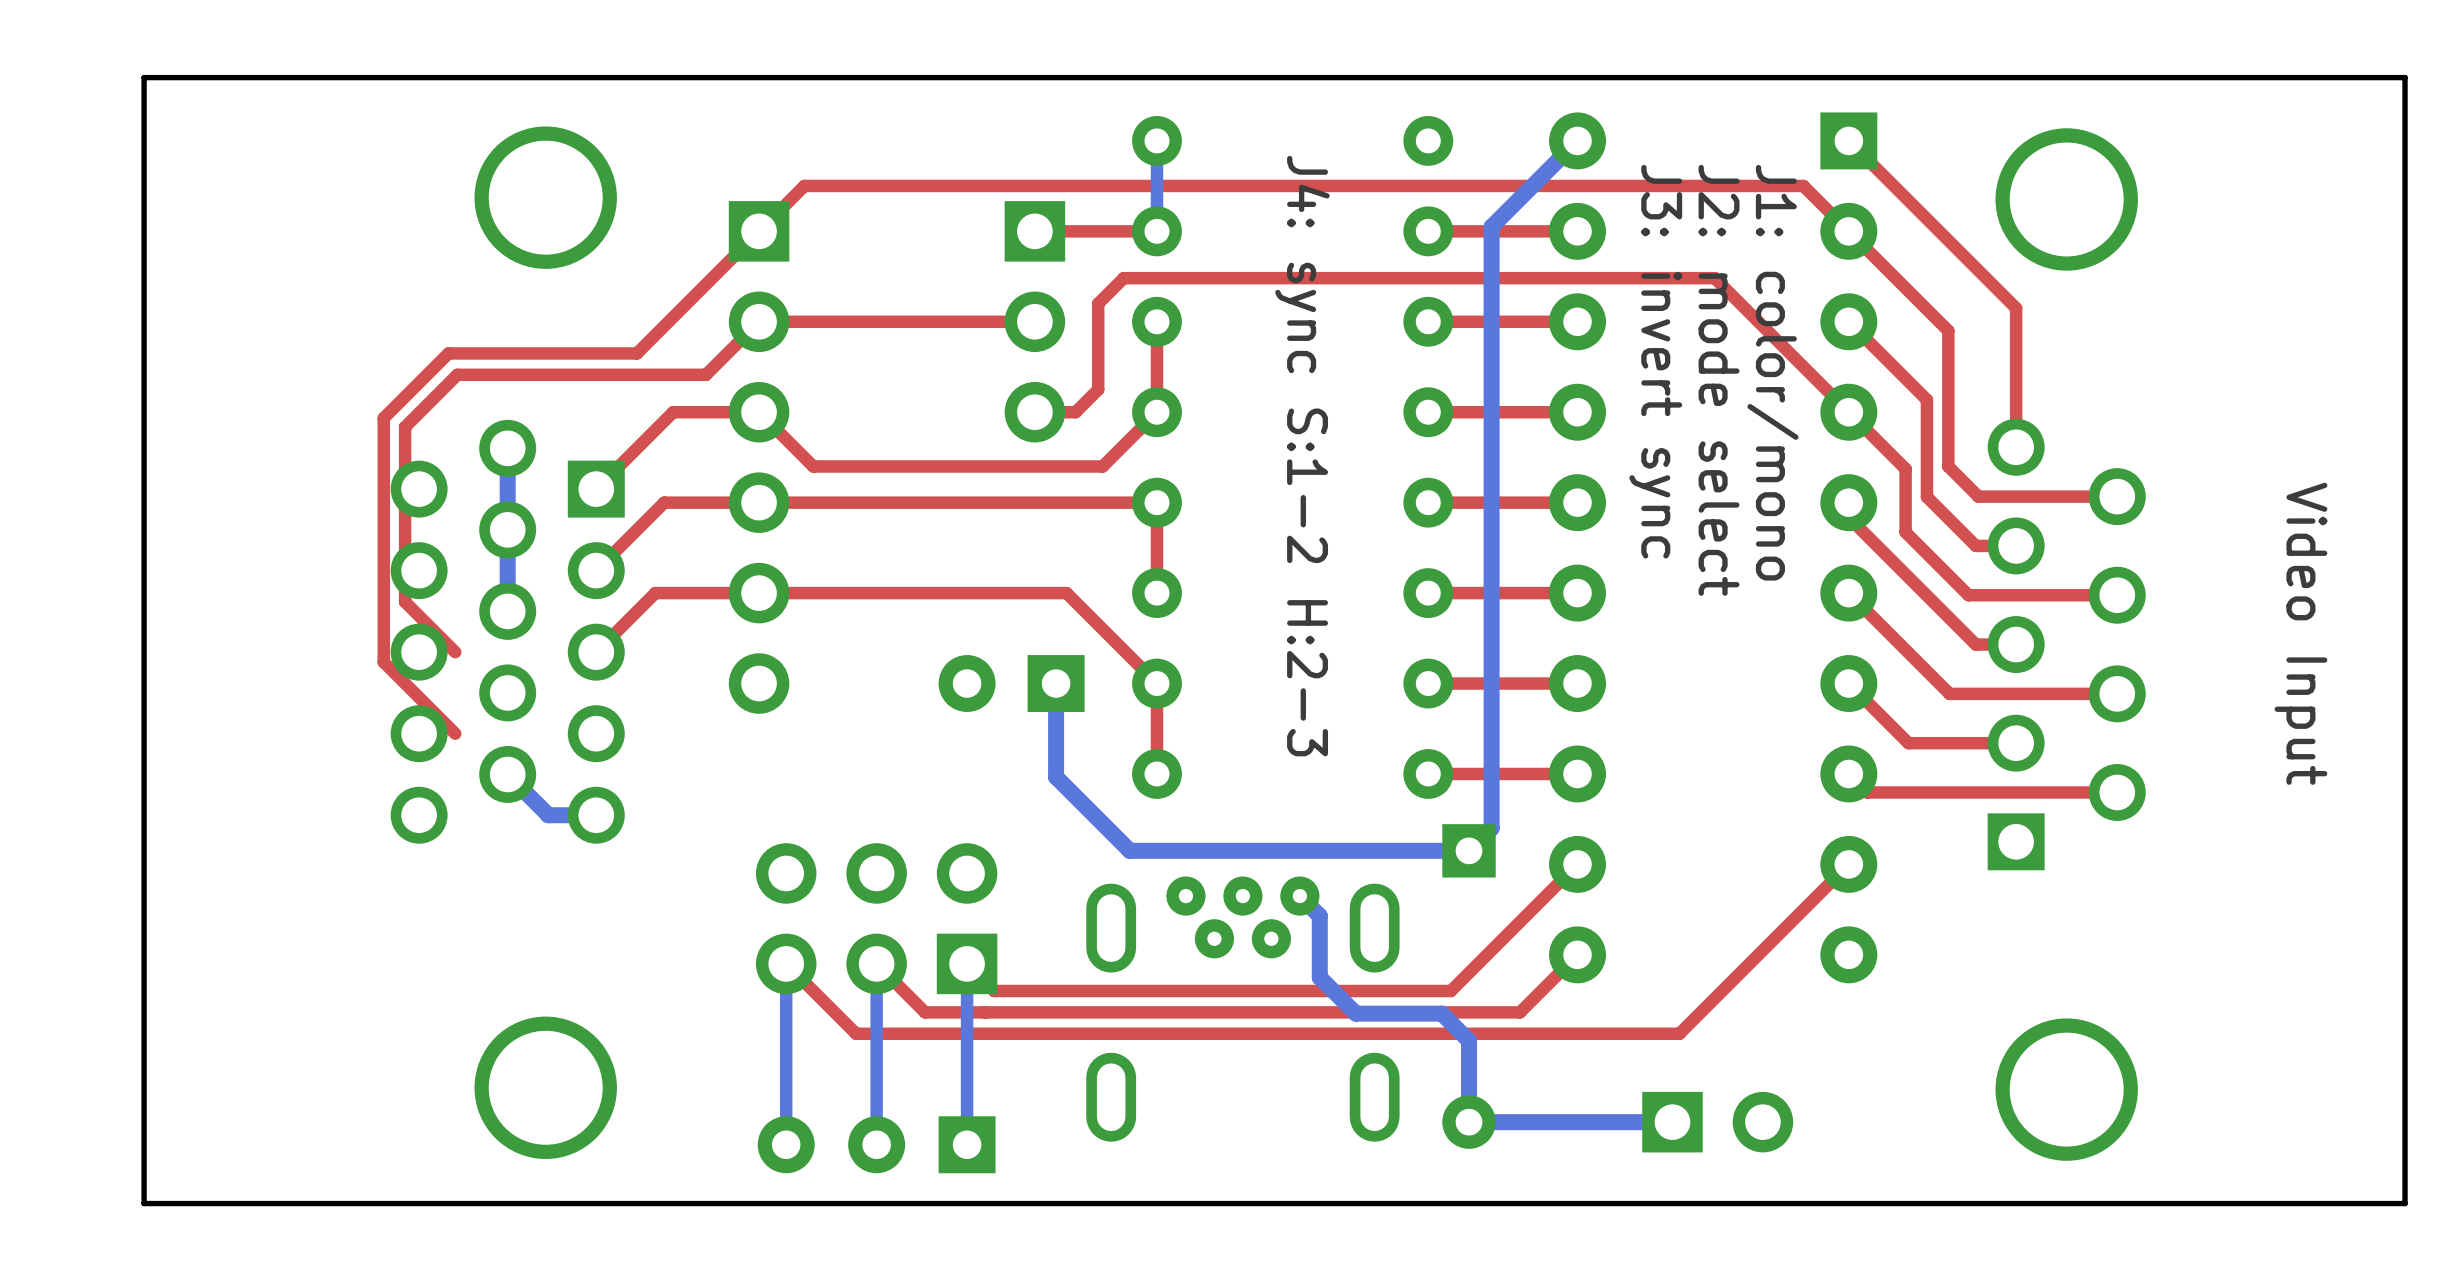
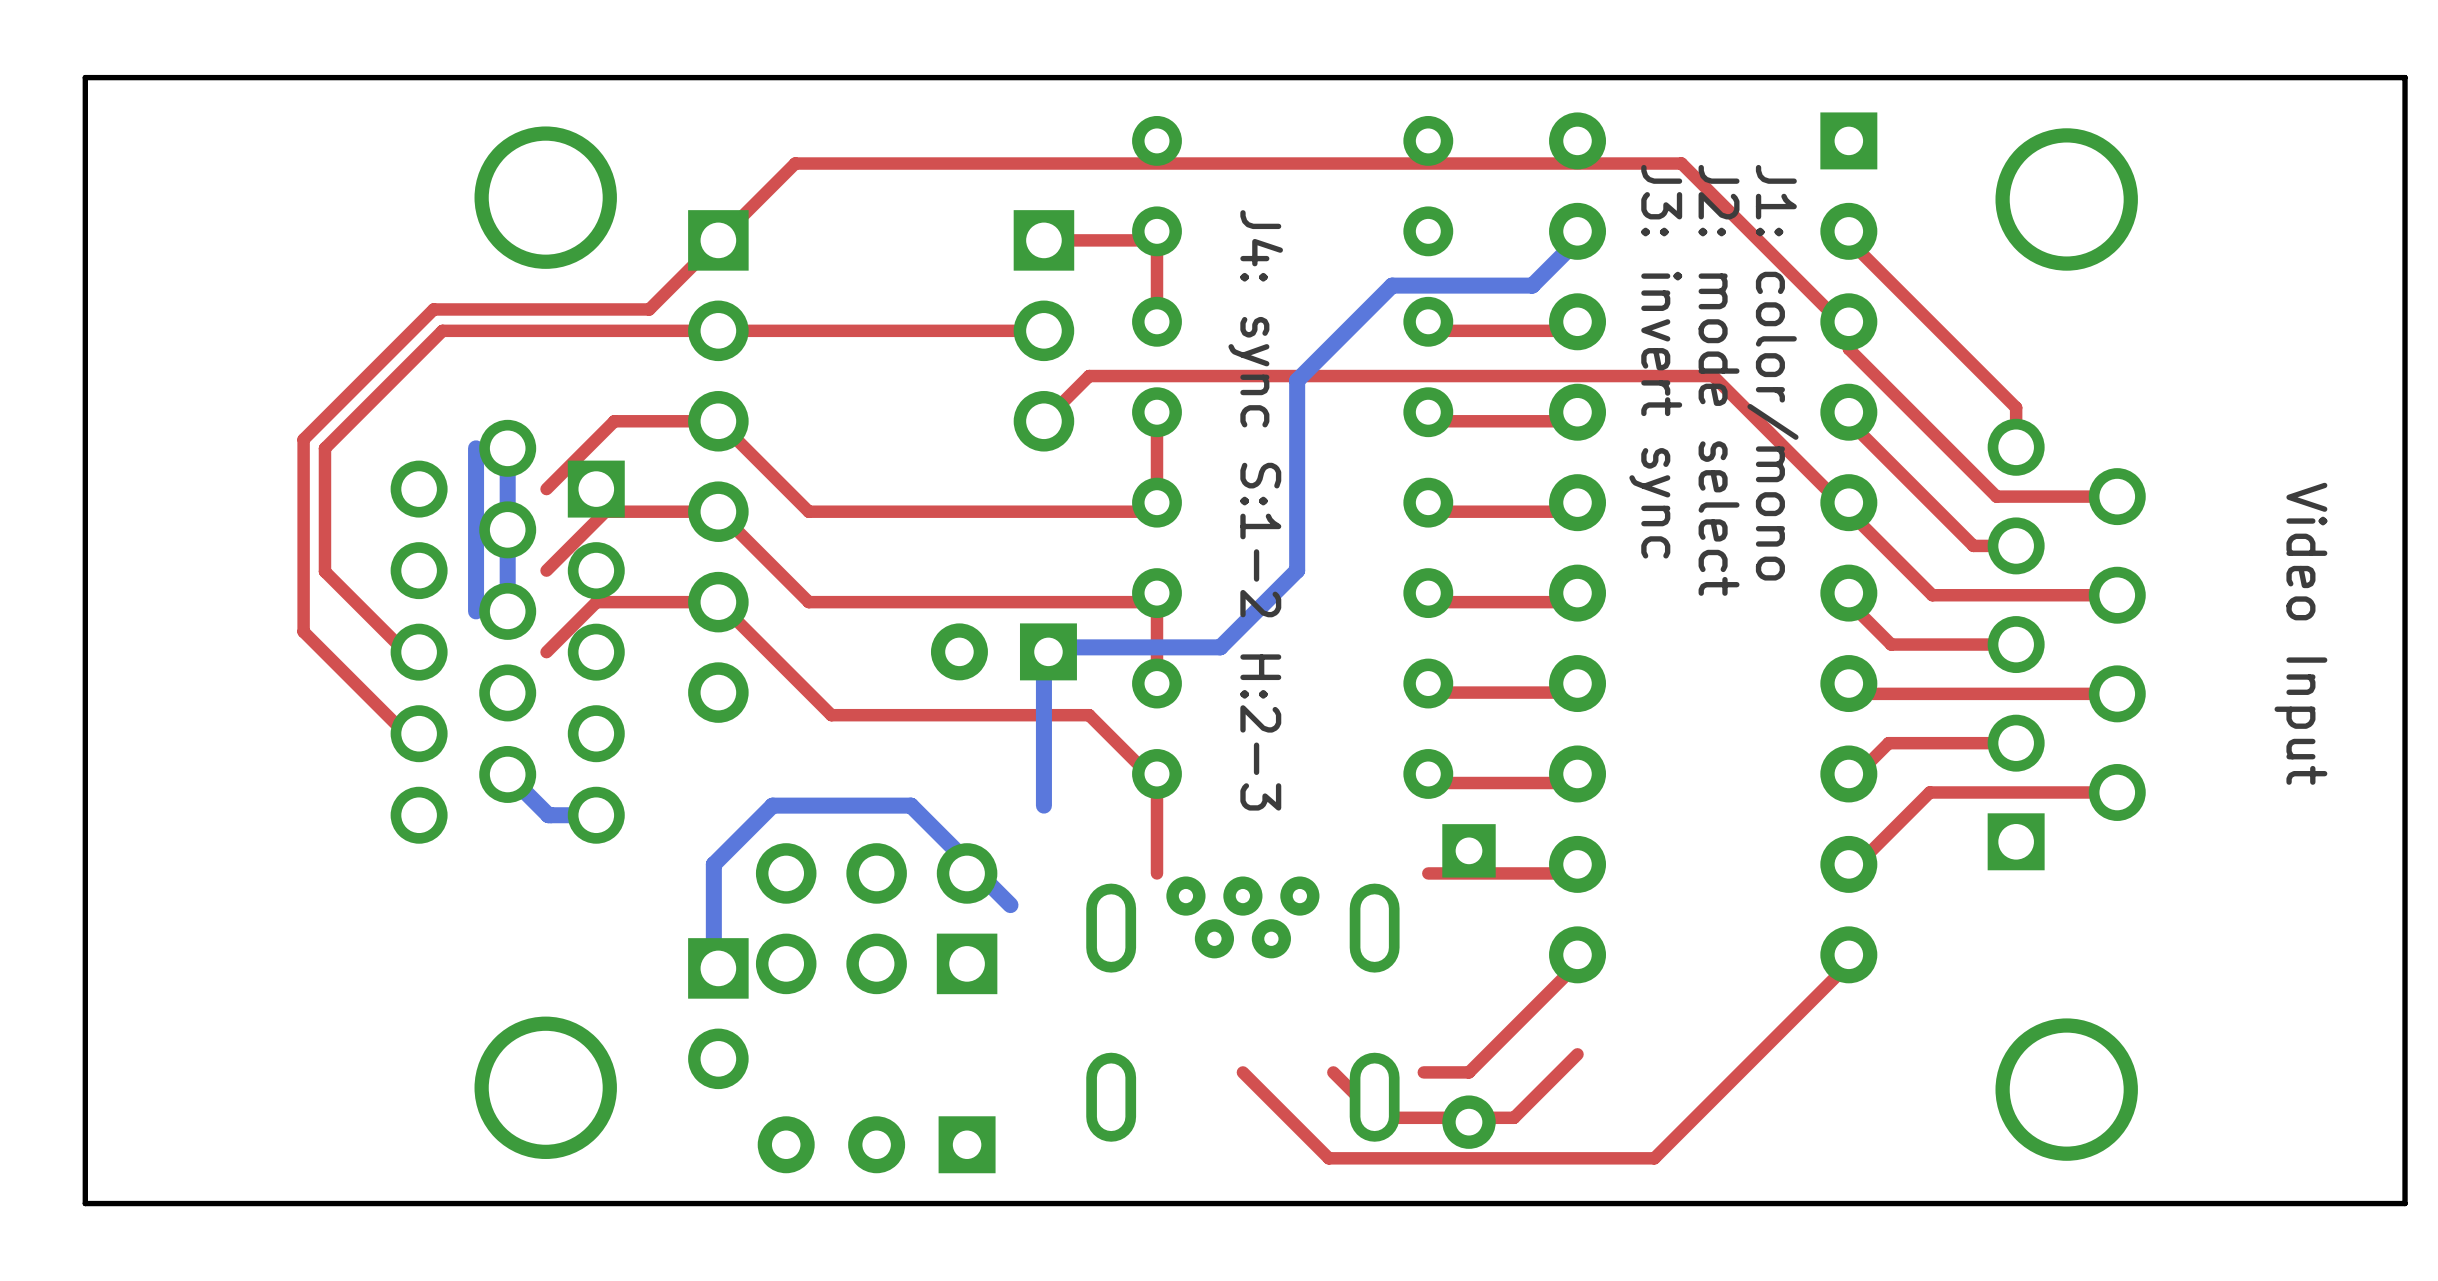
board edge: (144, 77) (144, 1203) -> (144, 77) (85, 77) (85, 1203) (144, 1203)
bottom track: (1156, 140) (1156, 231) -> none
bottom track: (1577, 140) (1491, 226) (1491, 828) (1469, 850) (1129, 850) (1056, 777) (1056, 683) -> none
top track: (1848, 140) (2016, 308) (2016, 407) -> (1848, 240) (2016, 407)
top track: (1156, 231) (1034, 231) -> none
top track: (1577, 231) (1428, 231) -> (1577, 330) (1428, 330)
top track: none -> (1043, 240) (1156, 240) (1156, 321)
bottom track: none -> (1577, 240) (1532, 285) (1392, 285) (1297, 380) (1297, 570) (1220, 647) (1052, 647) (1043, 656) (1043, 805)
top track: (1034, 321) (759, 321) (706, 374) (457, 374) (405, 427) (405, 602) (455, 652) -> none
part position: (1034, 321) -> (1043, 330)
top track: (1577, 321) (1428, 321) -> (1577, 421) (1428, 421)
top track: (1848, 321) (1926, 399) (1926, 497) (1975, 545) -> (1848, 421) (1973, 545) (1975, 545)
top track: none -> (1043, 330) (442, 330) (324, 448) (324, 571) (405, 652)
top track: (1156, 330) (1156, 412) (1102, 466) (813, 466) (759, 412) (673, 412) (596, 489) -> none
top track: (1034, 412) (1075, 412) (1098, 389) (1098, 303) (1123, 278) (1714, 278) (1905, 468) (1905, 532) (1968, 595) -> (1043, 421) (1089, 376) (1713, 376) (1932, 595) (1968, 595)
top track: (1577, 412) (1428, 412) -> (1577, 511) (1428, 511)
bottom track: none -> (476, 448) (476, 611)
text position: J4: sync S:1-2 H:2-3 (1302, 456) -> J4: sync S:1-2 H:2-3 (1255, 510)
part position: (759, 457) -> (718, 466)
top track: (1996, 496) (1978, 496) (1948, 466) (1948, 330) (1803, 185) (804, 185) (636, 353) (448, 353) (383, 418) (383, 662) (455, 733) -> (1996, 496) (1848, 348) (1848, 330) (1681, 163) (795, 163) (649, 309) (433, 309) (303, 439) (303, 631) (405, 733)
top track: (1156, 502) (664, 502) (596, 570) -> (1156, 502) (1156, 421)
top track: (1577, 502) (1428, 502) -> (1577, 602) (1428, 602)
top track: (1848, 502) (1848, 517) (1975, 644) -> (1848, 602) (1891, 644) (1975, 644)
top track: (1156, 511) (1156, 593) -> (1156, 511) (808, 511) (718, 421) (614, 421) (546, 489)
top track: (1577, 593) (1428, 593) -> (1577, 692) (1428, 692)
top track: (1848, 593) (1949, 693) -> (1848, 692) (1949, 693)
top track: none -> (546, 652) (596, 602) (718, 602) (831, 715) (1089, 715) (1156, 783) (1156, 873)
top track: (596, 652) (655, 593) (1066, 593) (1156, 683) -> (546, 570) (605, 511) (718, 511) (808, 602) (1156, 602) (1156, 683)
part position: (1011, 683) -> (1003, 651)
top track: (1577, 683) (1428, 683) -> (1577, 783) (1428, 783)
top track: (1848, 683) (1908, 743) -> (1848, 783) (1888, 743) (1908, 743)
top track: (1156, 692) (1156, 773) -> none
top track: (1577, 773) (1428, 773) -> (1577, 873) (1428, 873)
top track: (1848, 773) (1867, 792) (1929, 792) -> (1848, 873) (1929, 792)
top track: (1577, 864) (1450, 991) (994, 991) (967, 963) -> none
top track: (1848, 864) (1679, 1033) (856, 1033) (786, 963) -> none
bottom track: (1299, 896) (1319, 915) (1319, 977) (1355, 1013) (1441, 1013) (1469, 1040) (1469, 1117) (1473, 1122) (1654, 1122) (1672, 1104) -> none
bottom track: none -> (1010, 905) (910, 805) (772, 805) (713, 864) (713, 963) (718, 968)
top track: (1577, 954) (1519, 1012) (925, 1012) (876, 963) -> none
bottom track: (786, 963) (786, 1144) -> none
bottom track: (876, 963) (876, 1144) -> none
bottom track: (967, 963) (967, 1144) -> none
top track: none -> (1577, 963) (1469, 1072) (1423, 1072)
top track: none -> (1848, 963) (1654, 1158) (1328, 1158) (1242, 1072)
part: none -> (718, 1013)
top track: none -> (1577, 1054) (1514, 1117) (1378, 1117) (1333, 1072)
part: (1717, 1122) -> none

